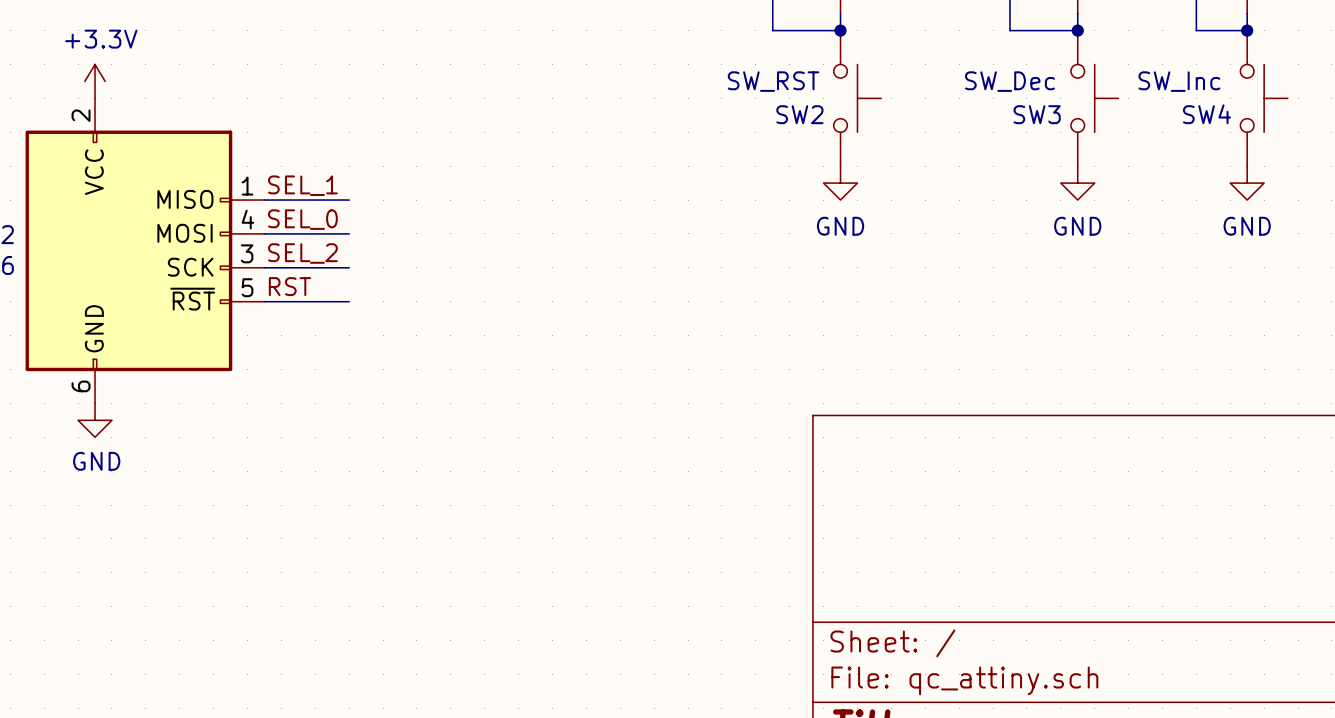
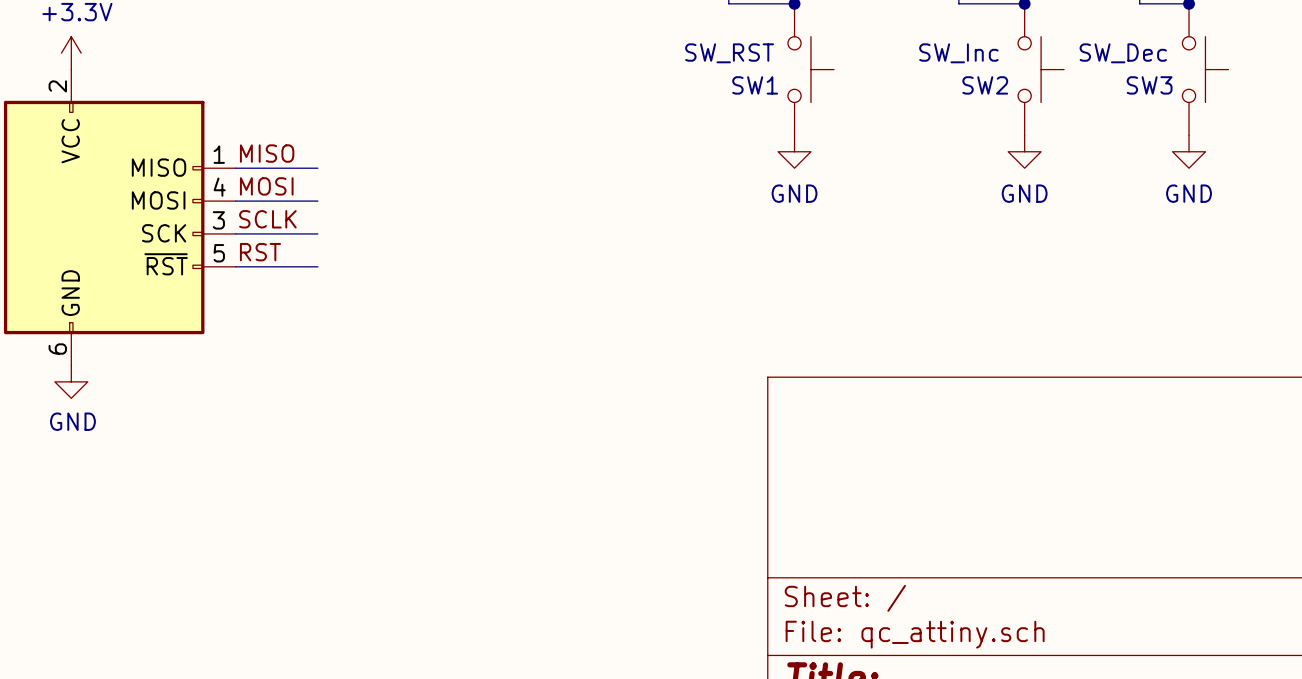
SW3 value: SW_Dec (1009, 81) -> SW_Inc (958, 53)
SW4 value: SW_Inc (1179, 81) -> SW_Dec (1123, 53)
SW2 name: SW2 (799, 114) -> SW1 (755, 85)
SW3 name: SW3 (1037, 114) -> SW2 (985, 85)
SW4 name: SW4 (1206, 114) -> SW3 (1149, 85)
label: SEL_1 (302, 185) -> MISO (267, 153)
label: SEL_0 (302, 219) -> MOSI (266, 186)
label: SEL_2 (302, 253) -> SCLK (267, 219)

